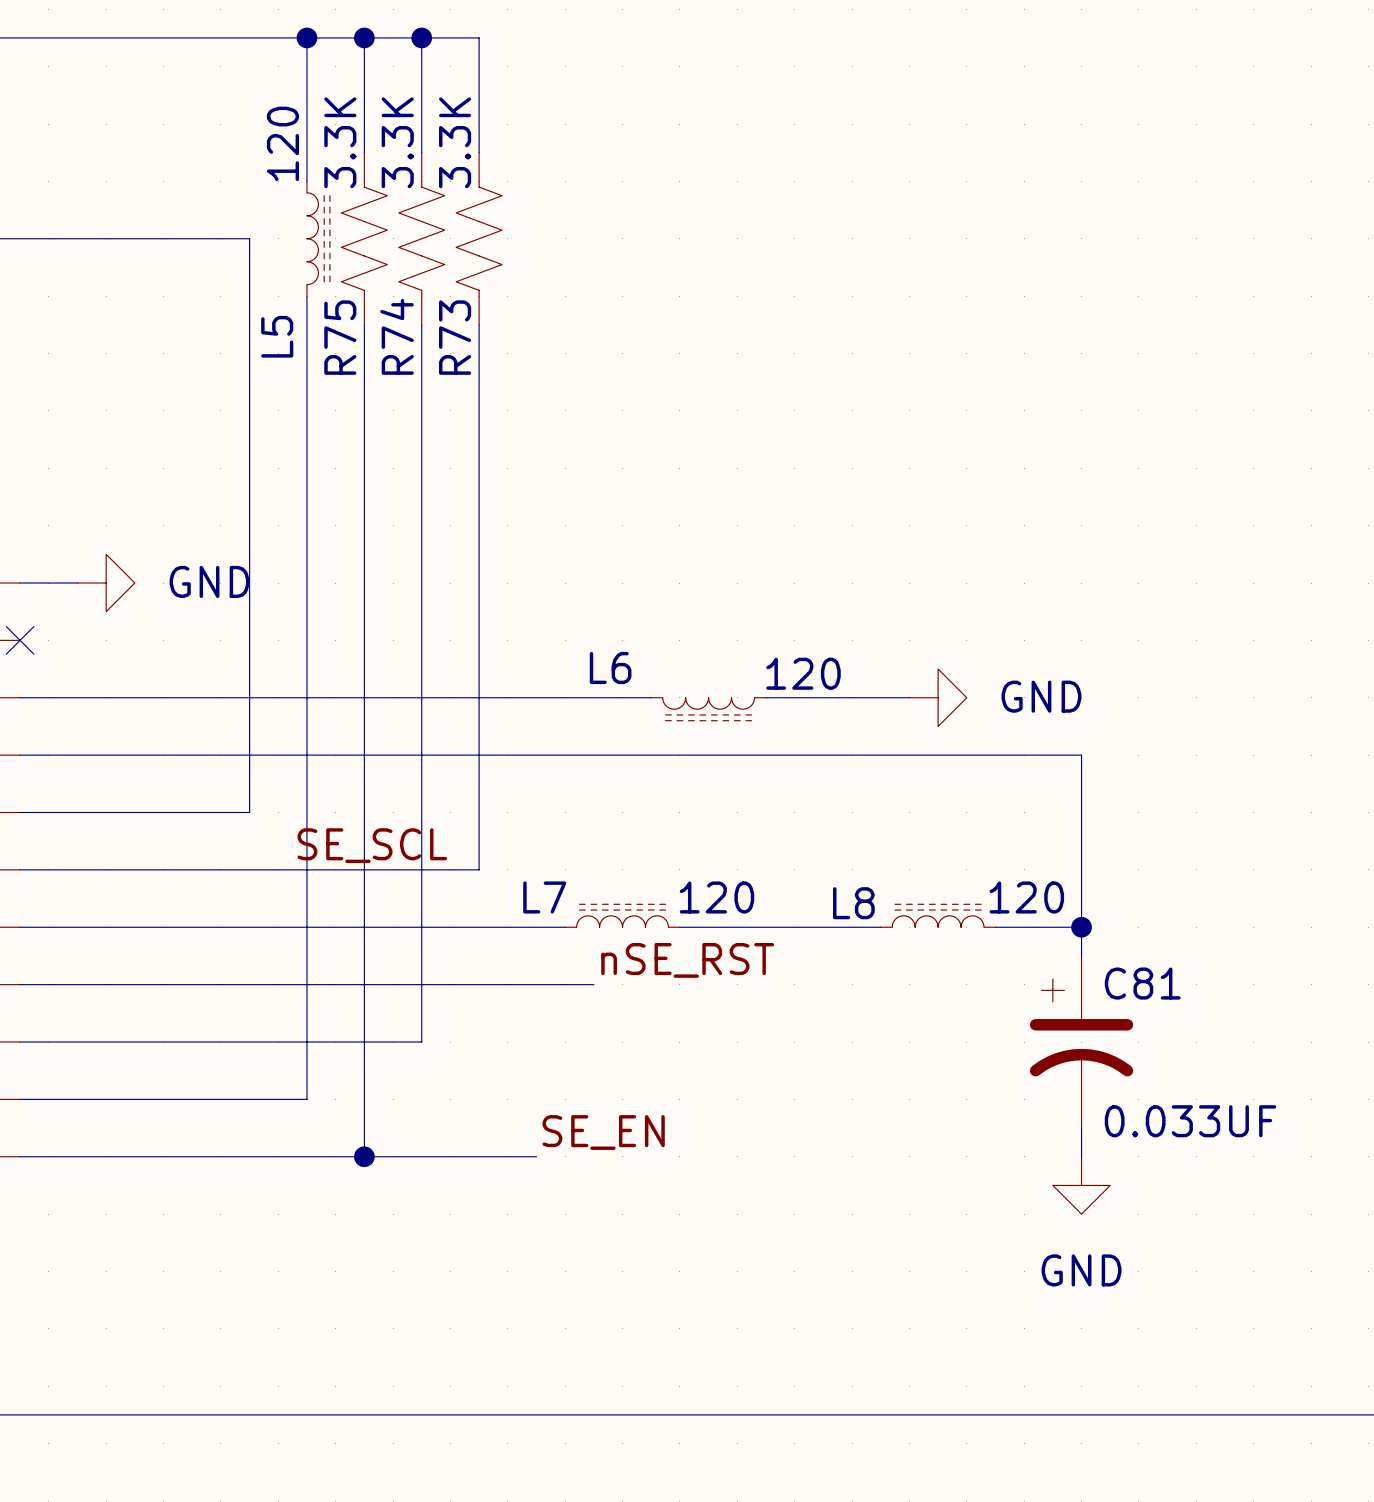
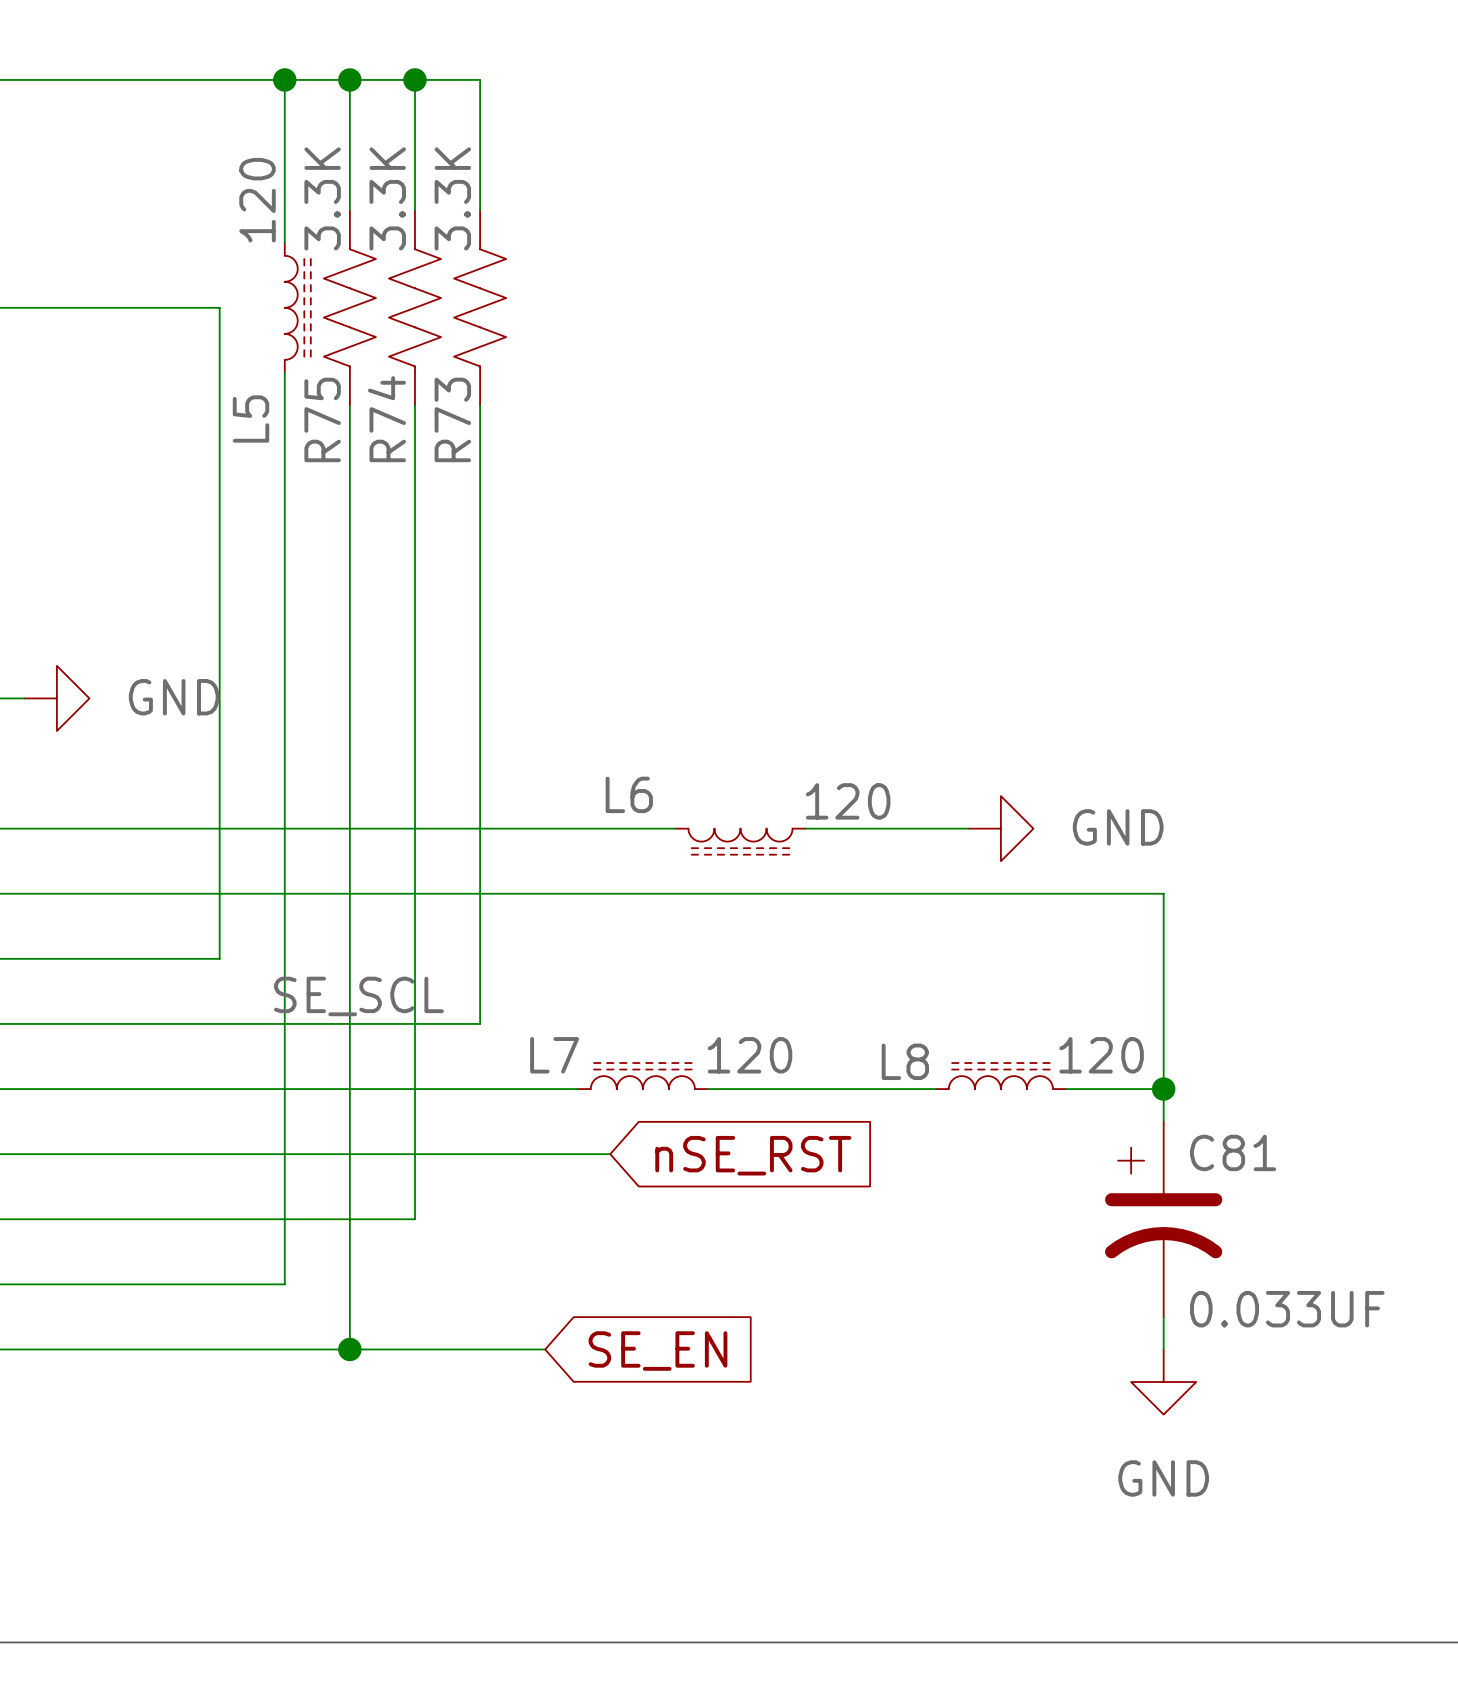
label: nSE_RST (687, 960) -> none
global label: none -> nSE_RST (753, 1155)
label: SE_EN (603, 1132) -> none
global label: none -> SE_EN (658, 1351)

